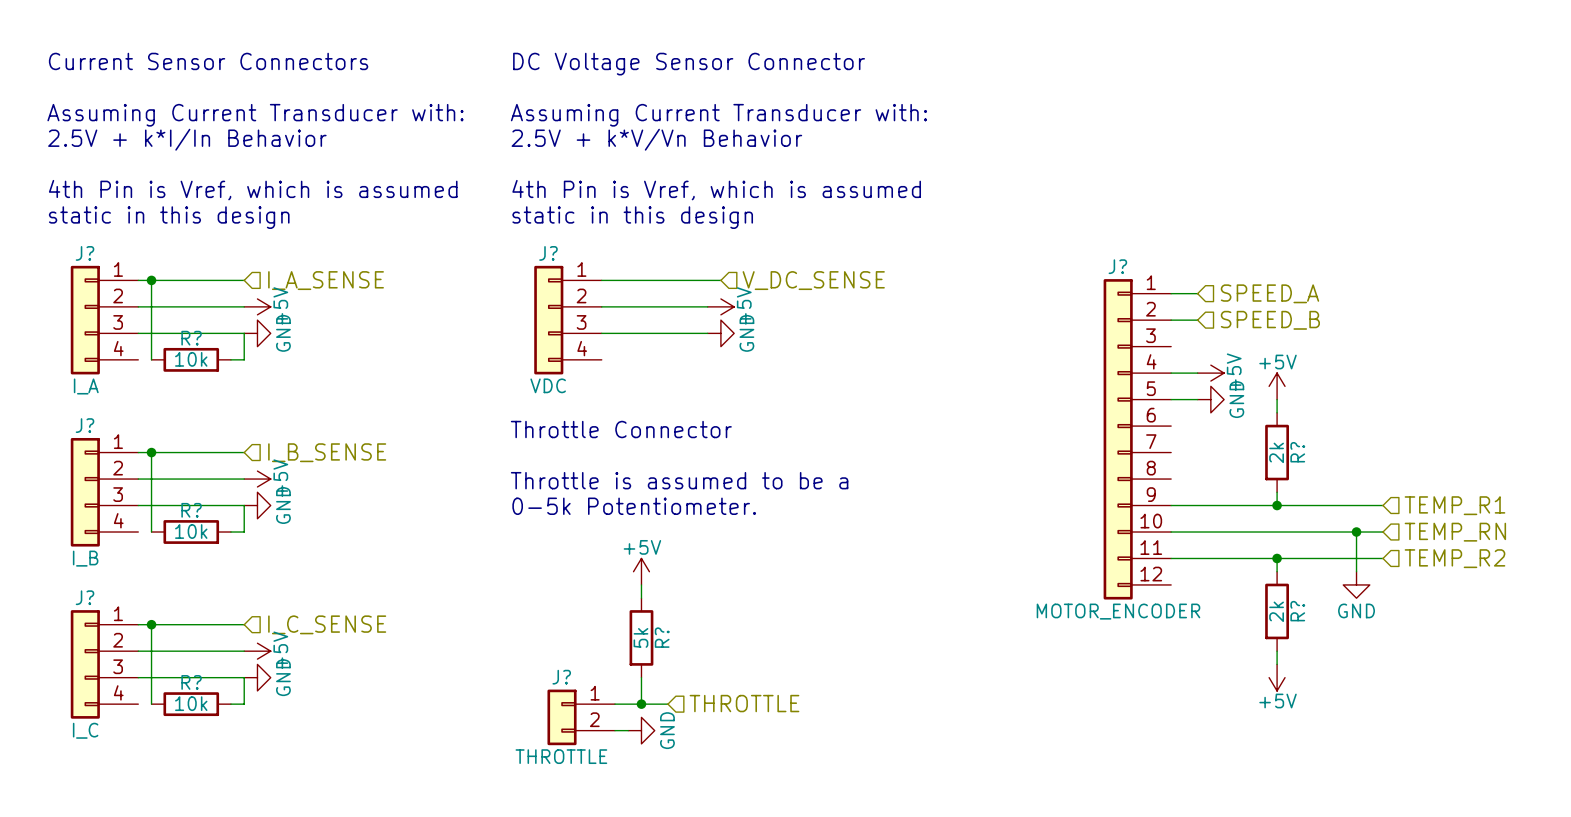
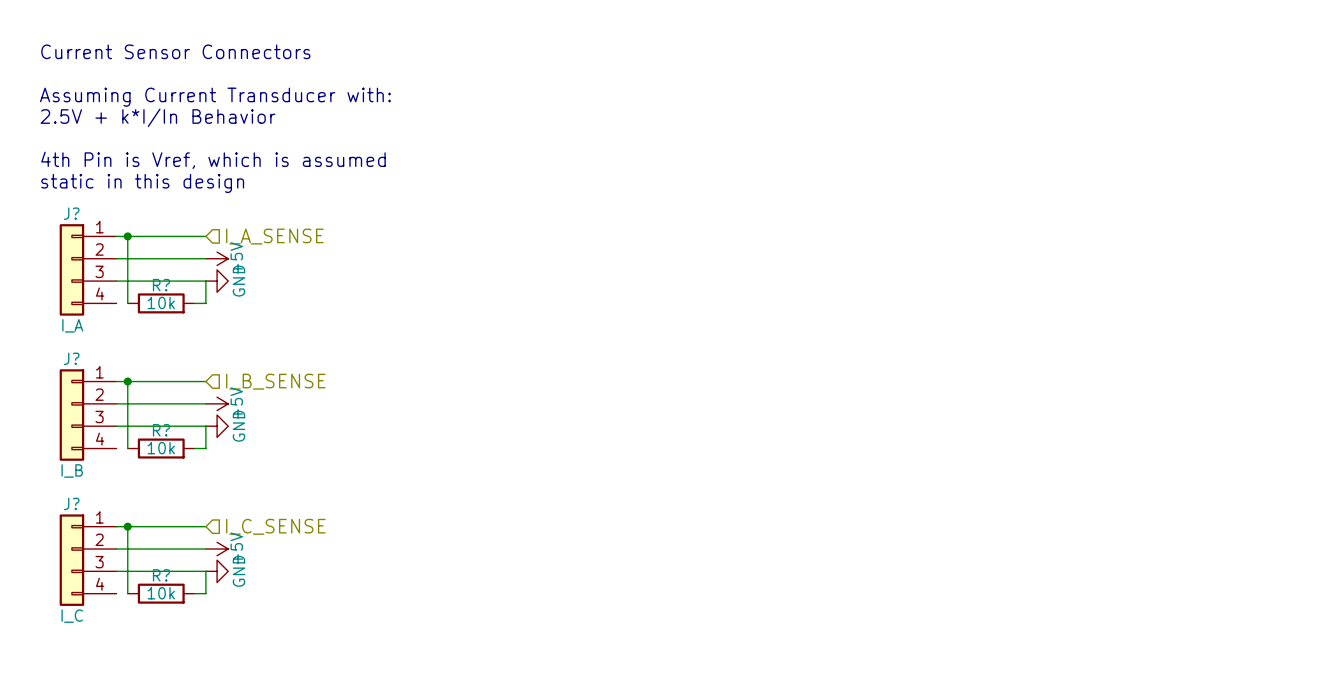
text: DC Voltage Sensor Connector (689, 64) -> none
text: Assuming Current Transducer with: (718, 115) -> none
text: 2.5V + k*V/Vn Behavior (656, 139) -> none
text: 4th Pin is Vref, which is assumed (716, 190) -> none
text: static in this design (632, 217) -> none
wire: (601, 280) (720, 280) -> none
hierarchical label: V_DC_SENSE (813, 280) -> none
wire: (1171, 293) (1197, 293) -> none
hierarchical label: SPEED_A (1269, 293) -> none
wire: (601, 306) (707, 306) -> none
power symbol: +5V (720, 306) -> none
J?: VDC (567, 320) -> none
wire: (1171, 320) (1197, 320) -> none
hierarchical label: SPEED_B (1270, 320) -> none
wire: (601, 333) (707, 333) -> none
power symbol: GND (720, 333) -> none
wire: (1171, 373) (1197, 373) -> none
power symbol: +5V (1210, 373) -> none
power symbol: +5V (1277, 386) -> none
wire: (1171, 399) (1197, 399) -> none
power symbol: GND (1210, 399) -> none
wire: (1277, 399) (1277, 412) -> none
text: Throttle Connector (621, 429) -> none
J?: MOTOR_ENCODER (1137, 439) -> none
R?: 2k (1277, 452) -> none
text: Throttle is assumed to be a (679, 480) -> none
wire: (1277, 492) (1277, 505) -> none
wire: (1171, 505) (1383, 505) -> none
junction: (1277, 505) -> none
hierarchical label: TEMP_R1 (1454, 505) -> none
text: 0-5k Potentiometer. (634, 506) -> none
wire: (1171, 532) (1383, 532) -> none
wire: (1356, 532) (1356, 571) -> none
junction: (1356, 532) -> none
hierarchical label: TEMP_RN (1455, 532) -> none
wire: (1171, 558) (1383, 558) -> none
wire: (1277, 558) (1277, 571) -> none
junction: (1277, 558) -> none
hierarchical label: TEMP_R2 (1454, 558) -> none
power symbol: +5V (641, 571) -> none
wire: (641, 584) (641, 598) -> none
power symbol: GND (1356, 584) -> none
R?: 2k (1277, 611) -> none
R?: 5k (641, 637) -> none
wire: (1277, 651) (1277, 664) -> none
wire: (641, 677) (641, 704) -> none
power symbol: +5V (1277, 677) -> none
hierarchical label: THROTTLE (744, 703) -> none
wire: (614, 704) (667, 704) -> none
junction: (641, 704) -> none
J?: THROTTLE (581, 717) -> none
wire: (614, 730) (628, 730) -> none
power symbol: GND (641, 730) -> none

